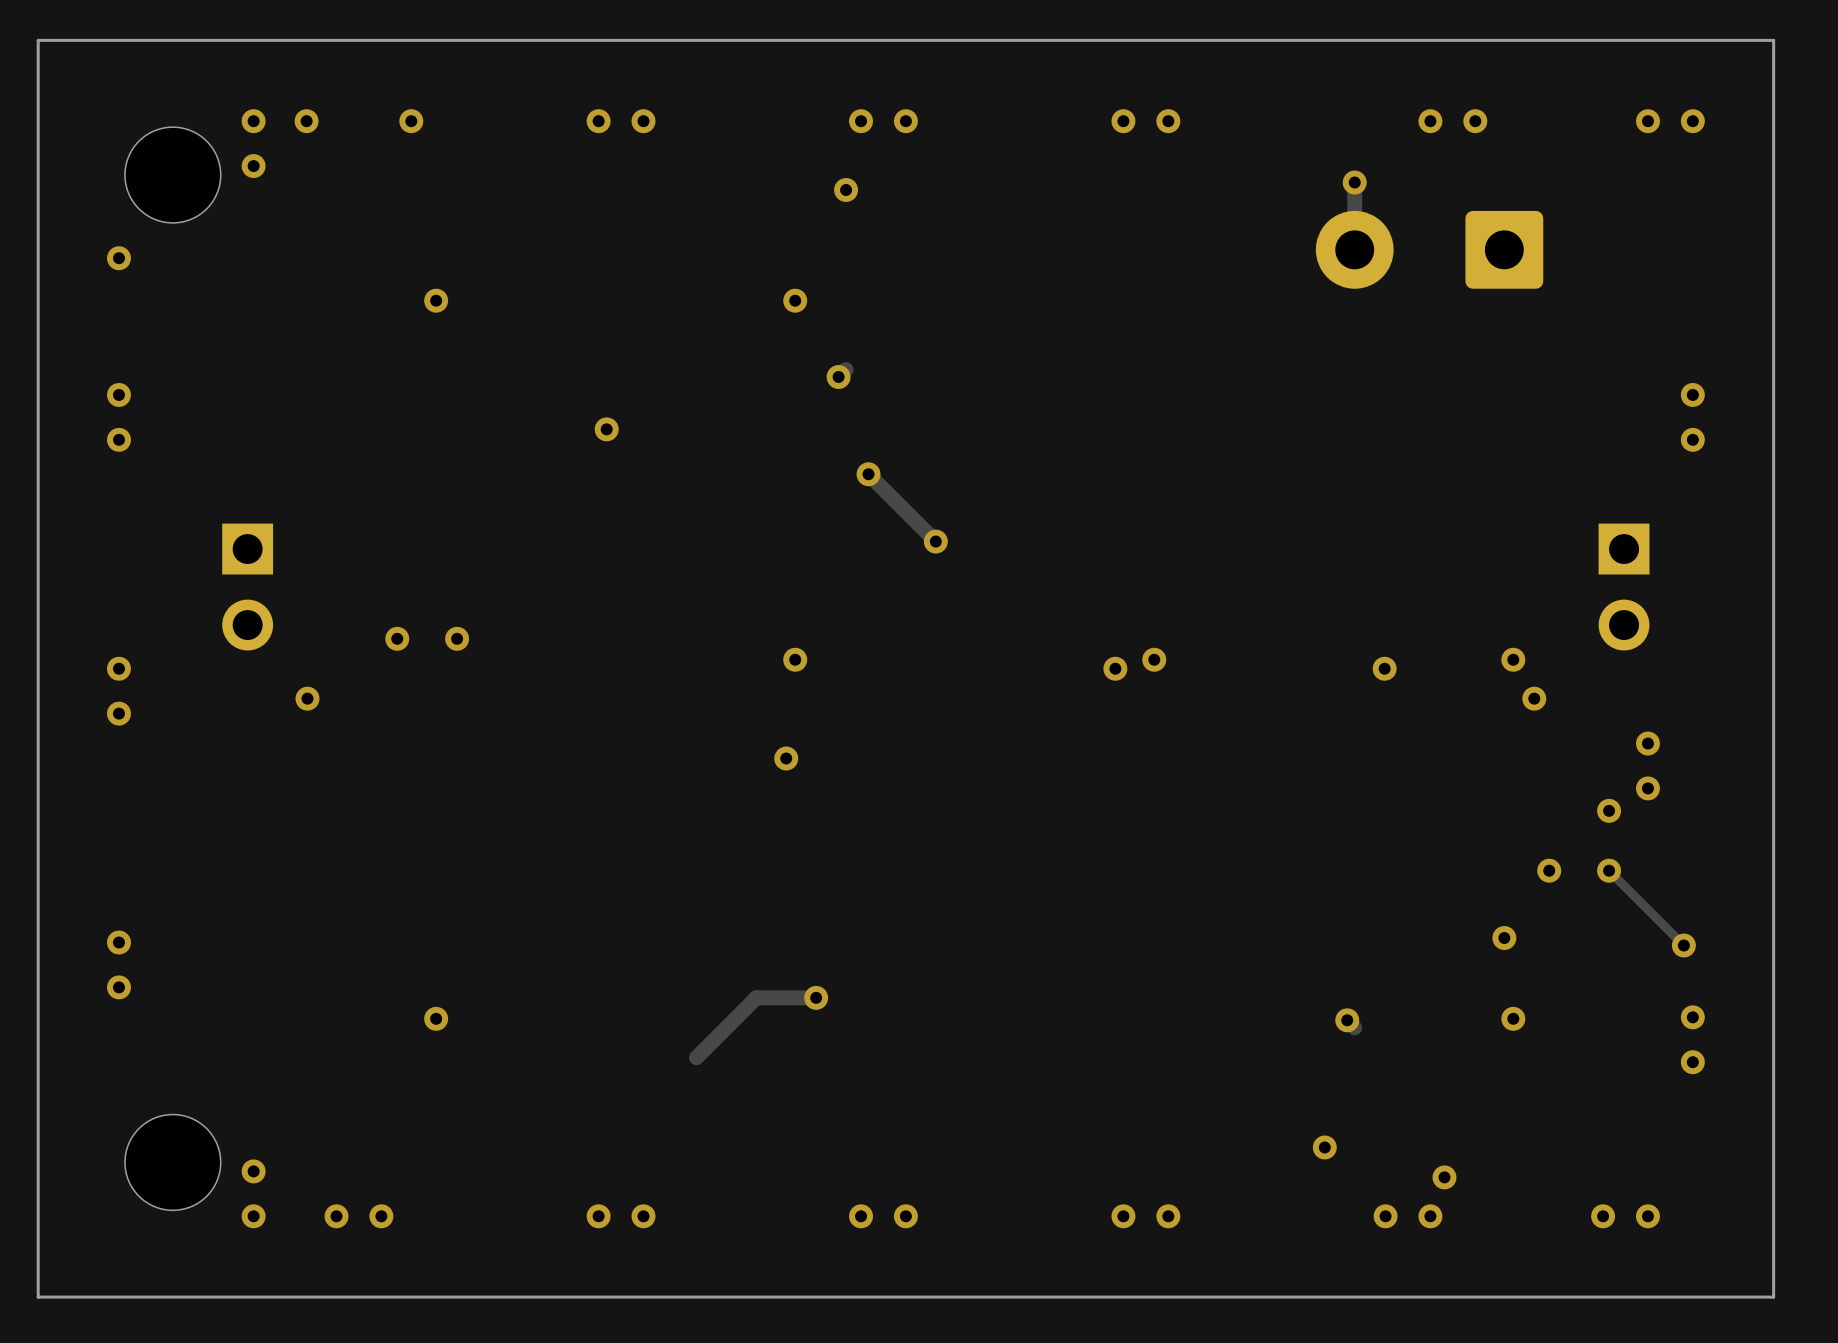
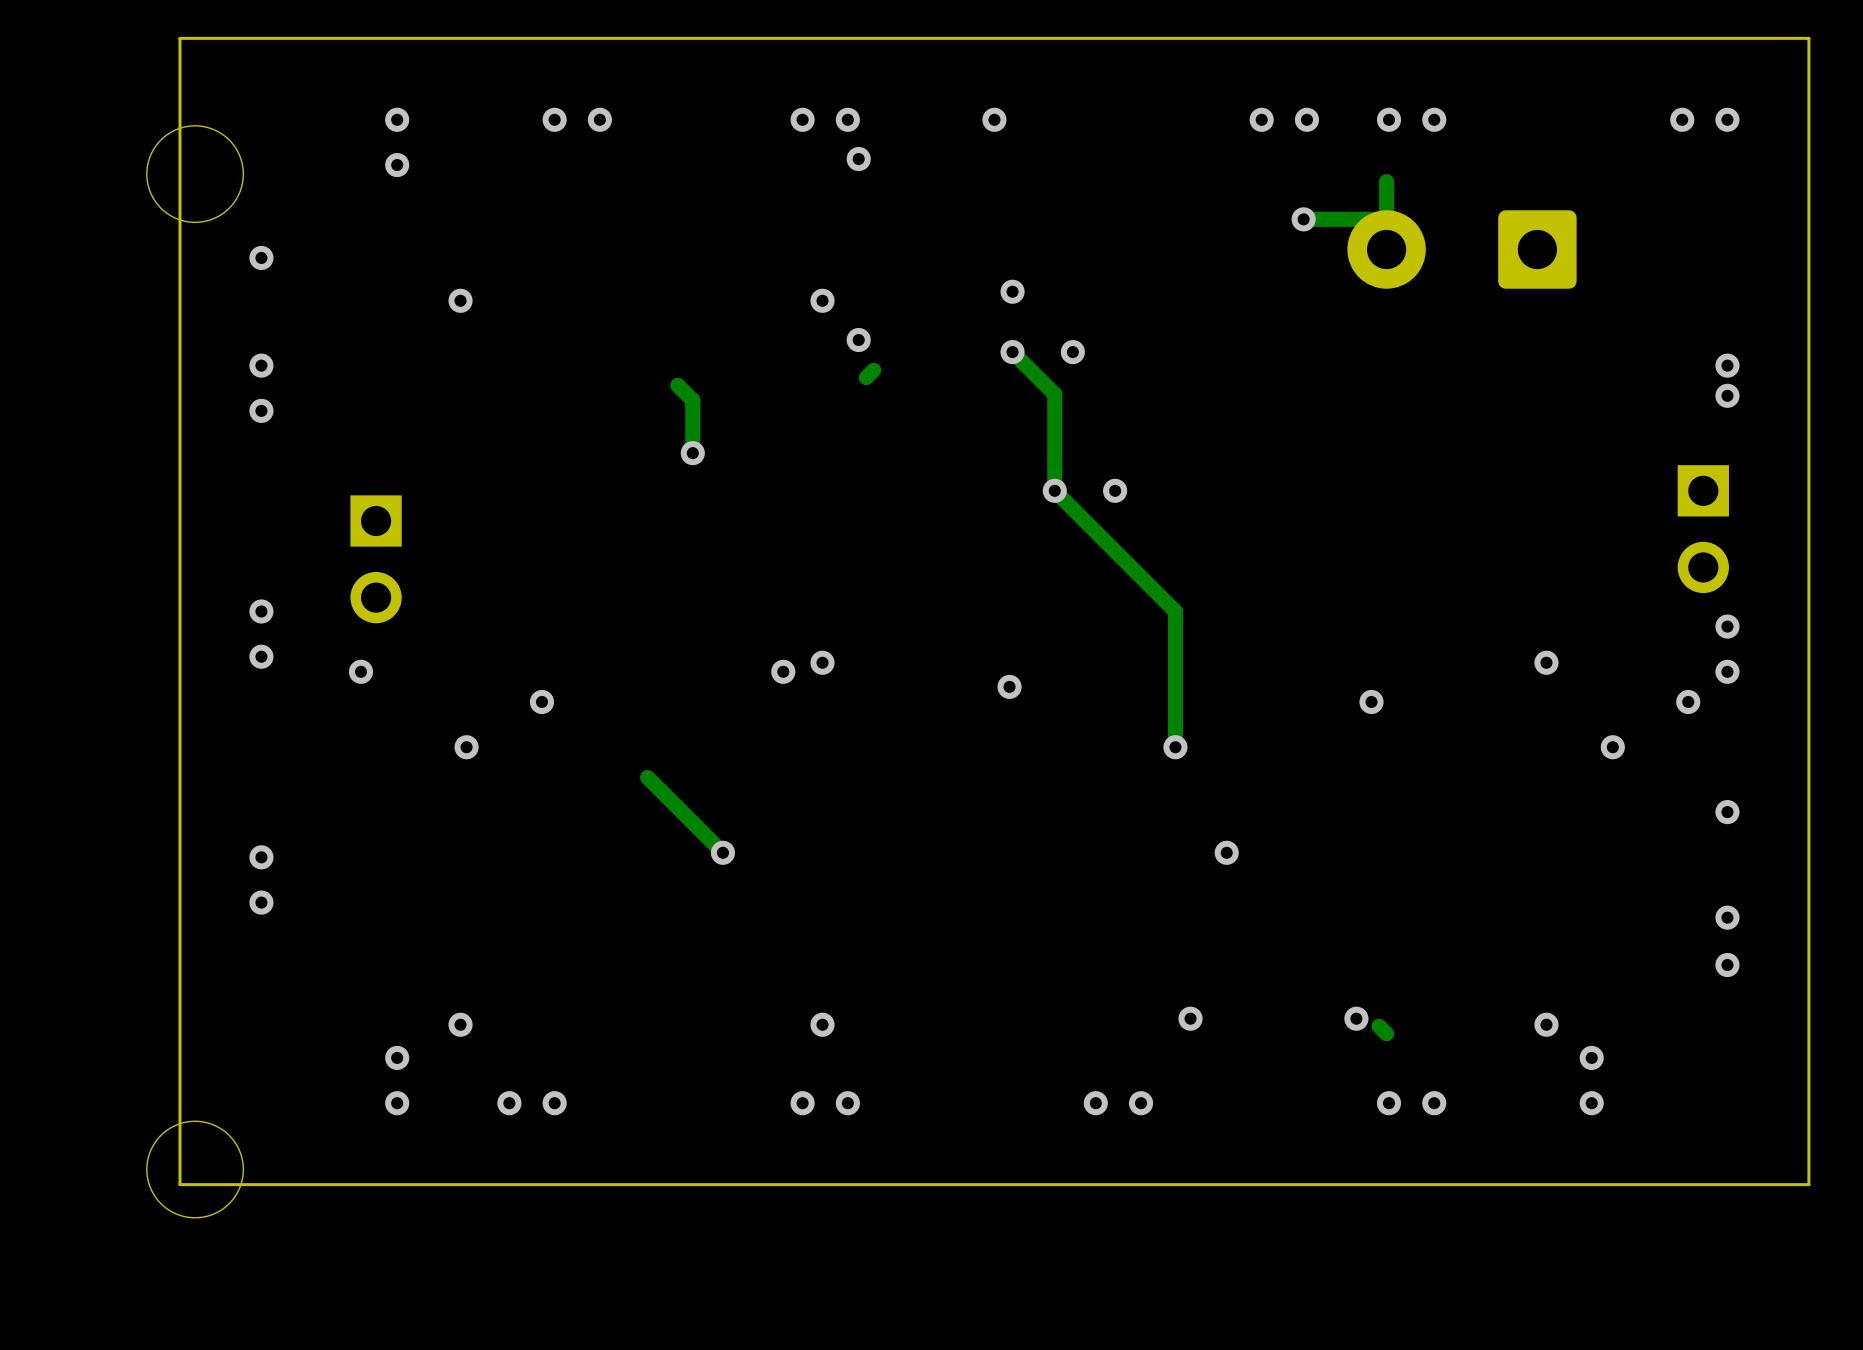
board edge: (157, 40) (38, 40) (38, 1297) (1773, 1297) (1773, 1177) -> (180, 38) (180, 1184) (1808, 1184)
via: (253, 121) -> none
via: (306, 121) -> none
via: none -> (397, 119)
via: (411, 121) -> none
via: none -> (554, 119)
via position: (598, 121) -> (599, 119)
via: (643, 121) -> none
via: none -> (802, 119)
via: none -> (847, 119)
via: (861, 121) -> none
via: (905, 121) -> none
via: none -> (994, 119)
via: (1123, 121) -> none
via: (1168, 121) -> none
via: none -> (1261, 119)
via: none -> (1306, 119)
via: none -> (1389, 119)
via position: (1430, 121) -> (1434, 119)
via: (1475, 121) -> none
via: none -> (858, 159)
via: (253, 166) -> none
via: none -> (397, 165)
via: (1354, 182) -> none
via: (846, 189) -> none
via: none -> (1303, 219)
track: none -> (1371, 219) (1303, 219)
via: (118, 258) -> none
via: none -> (261, 257)
via: none -> (1012, 291)
track: none -> (1012, 352) (1054, 394) (1054, 490) (1175, 611) (1175, 747)
via: none -> (1012, 352)
via: none -> (1072, 352)
via: none -> (261, 365)
via position: (838, 377) -> (858, 340)
track: none -> (677, 385) (692, 400) (692, 453)
via: (118, 394) -> none
via: none -> (261, 410)
via position: (606, 429) -> (692, 453)
via: (118, 439) -> none
via position: (1692, 439) -> (1727, 365)
track: (868, 474) (935, 541) -> none
via: (868, 474) -> none
via: none -> (1054, 490)
via: none -> (1115, 490)
via: (935, 541) -> none
part position: (247, 587) -> (376, 559)
part position: (1624, 587) -> (1703, 529)
via: none -> (261, 611)
via: none -> (1727, 626)
via: (397, 638) -> none
via: (457, 638) -> none
via: none -> (261, 656)
via: (1154, 659) -> none
via: (118, 668) -> none
via: none -> (360, 671)
via: none -> (783, 671)
via: (1115, 668) -> none
via position: (1384, 668) -> (1371, 701)
via: none -> (1727, 671)
via: none -> (1009, 686)
via: (307, 698) -> none
via: none -> (541, 701)
via: (1534, 698) -> none
via: none -> (1688, 701)
via: (118, 713) -> none
via: none -> (466, 747)
via: none -> (1175, 747)
via: none -> (1612, 747)
via: (1647, 743) -> none
via: (786, 758) -> none
track: none -> (647, 777) (722, 852)
via: (1647, 788) -> none
via: none -> (1727, 812)
via: (1609, 810) -> none
via: none -> (722, 852)
via: none -> (1226, 852)
via: none -> (261, 857)
via: (1549, 870) -> none
track: (1609, 870) (1683, 945) -> none
via: (1609, 870) -> none
via: none -> (261, 902)
via: none -> (1727, 917)
via: (1504, 938) -> none
via: (118, 942) -> none
via position: (1683, 945) -> (1727, 965)
via: (118, 987) -> none
track: (816, 997) (756, 997) (696, 1057) -> none
via position: (816, 997) -> (822, 1024)
via: none -> (1190, 1018)
via: (1692, 1017) -> none
via position: (1347, 1020) -> (1356, 1018)
via: none -> (397, 1057)
via: none -> (1591, 1057)
via: (1692, 1062) -> none
via: none -> (397, 1103)
via: none -> (509, 1103)
via: none -> (554, 1103)
via: none -> (802, 1103)
via: none -> (847, 1103)
via: none -> (1095, 1103)
via: none -> (1141, 1103)
via: none -> (1389, 1103)
via: none -> (1434, 1103)
via: none -> (1591, 1103)
via: (1324, 1147) -> none
via: (253, 1171) -> none
via: (1444, 1177) -> none
via: (253, 1216) -> none
via: (336, 1216) -> none
via: (381, 1216) -> none
via: (598, 1216) -> none
via: (643, 1216) -> none
via: (861, 1216) -> none
via: (905, 1216) -> none
via: (1123, 1216) -> none
via: (1168, 1216) -> none
via: (1385, 1216) -> none
via: (1430, 1216) -> none
via: (1603, 1216) -> none
via: (1647, 1216) -> none

